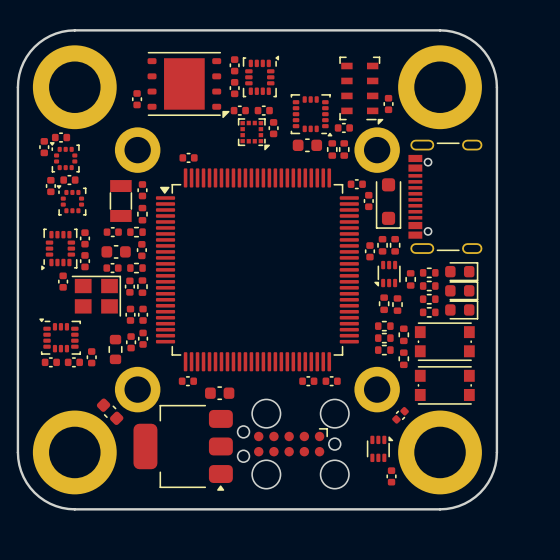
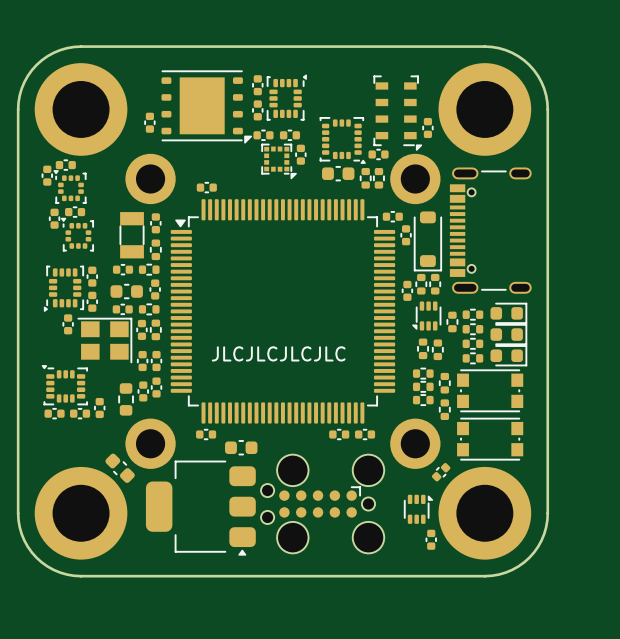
part footprint: [375, 178, 402, 229] -> [413, 211, 442, 272]
text: none -> JLCJLCJLCJLC (278, 353)

